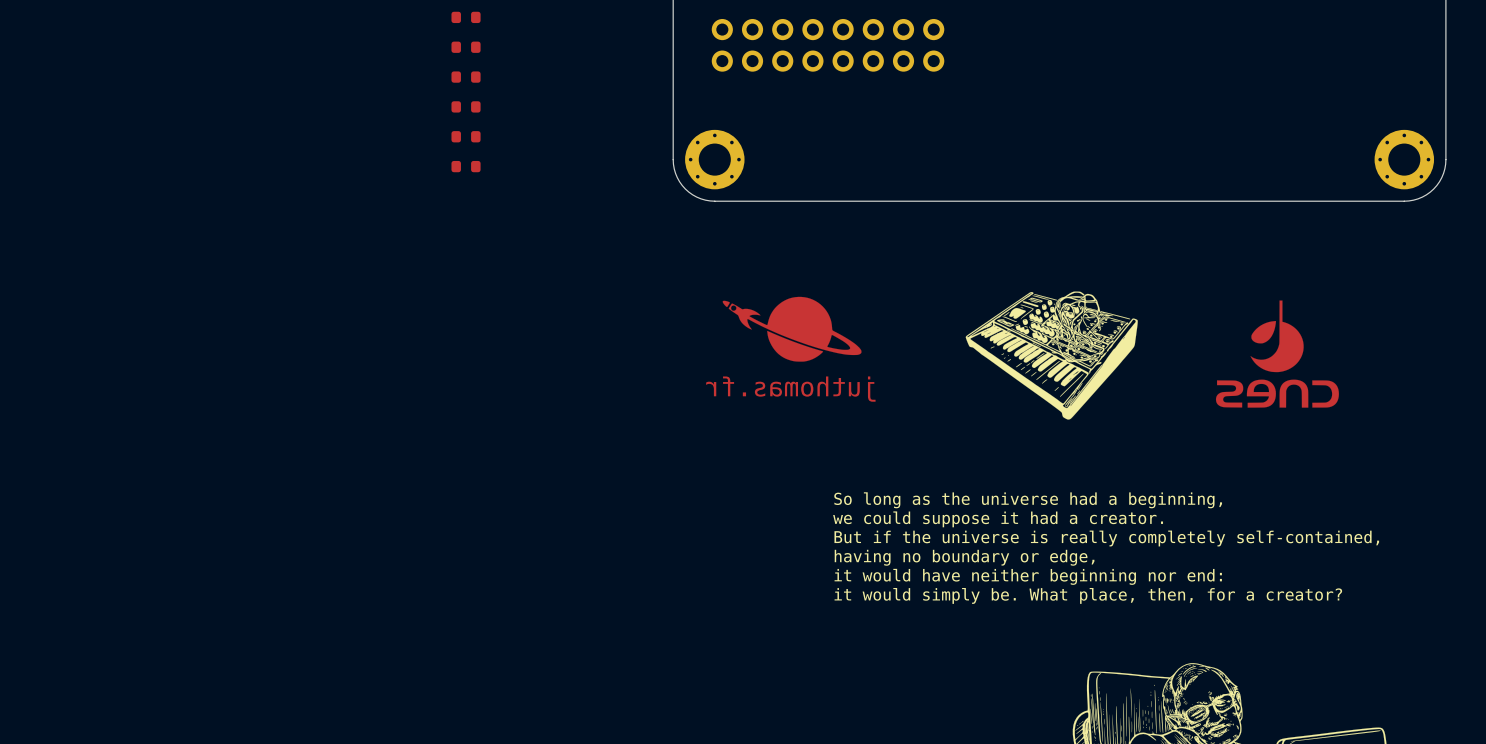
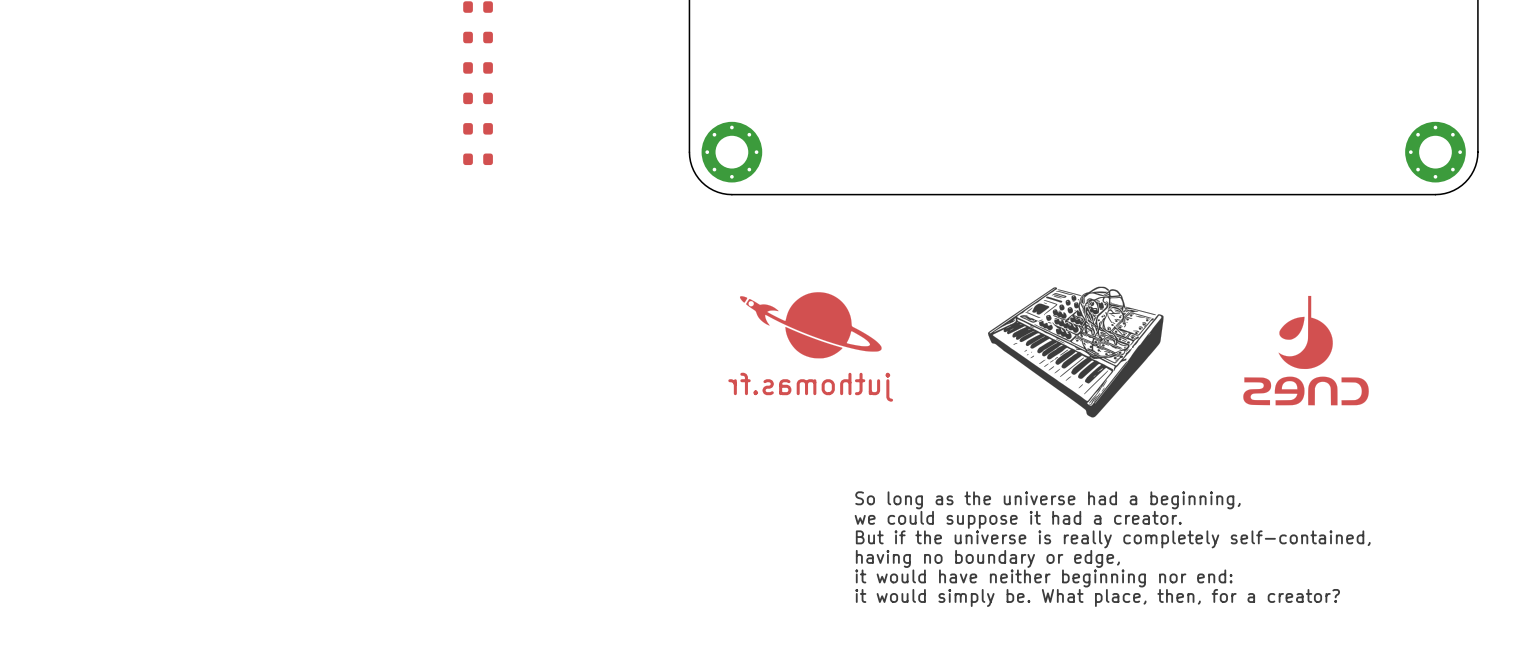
part: (828, 29) -> none
part: (828, 61) -> none

